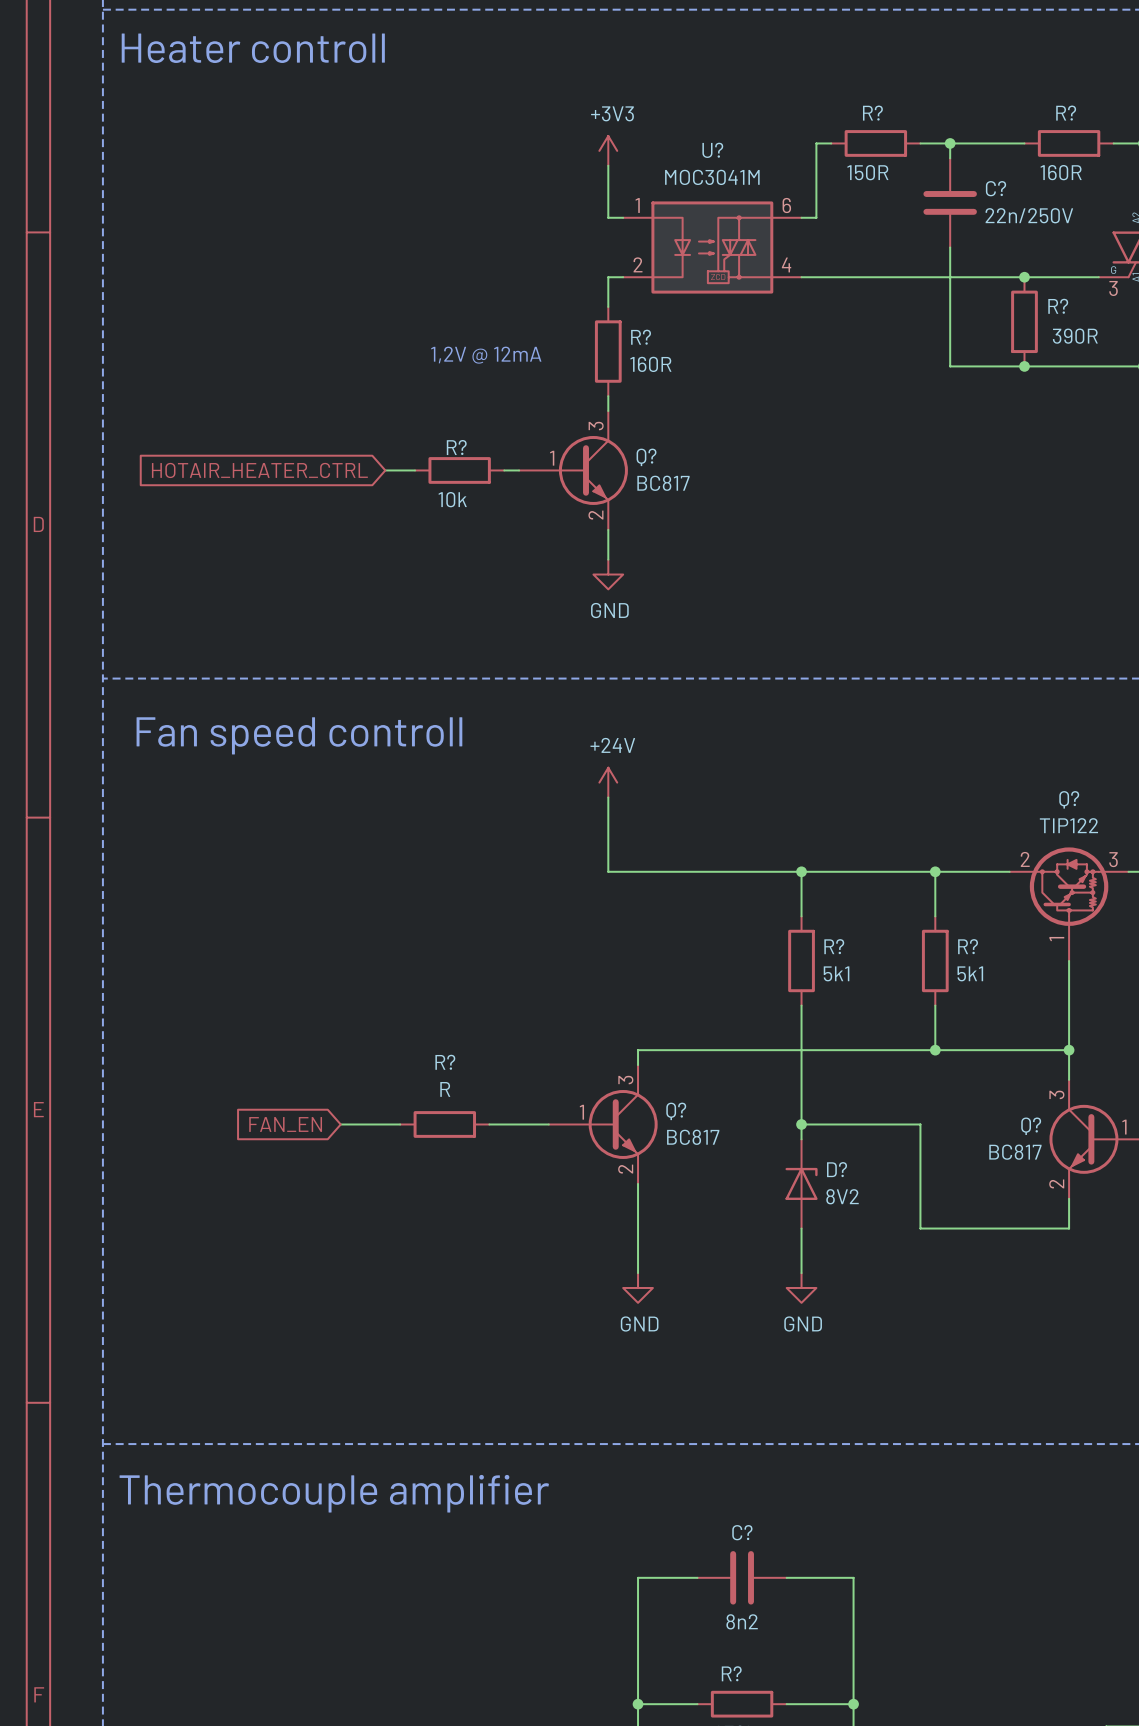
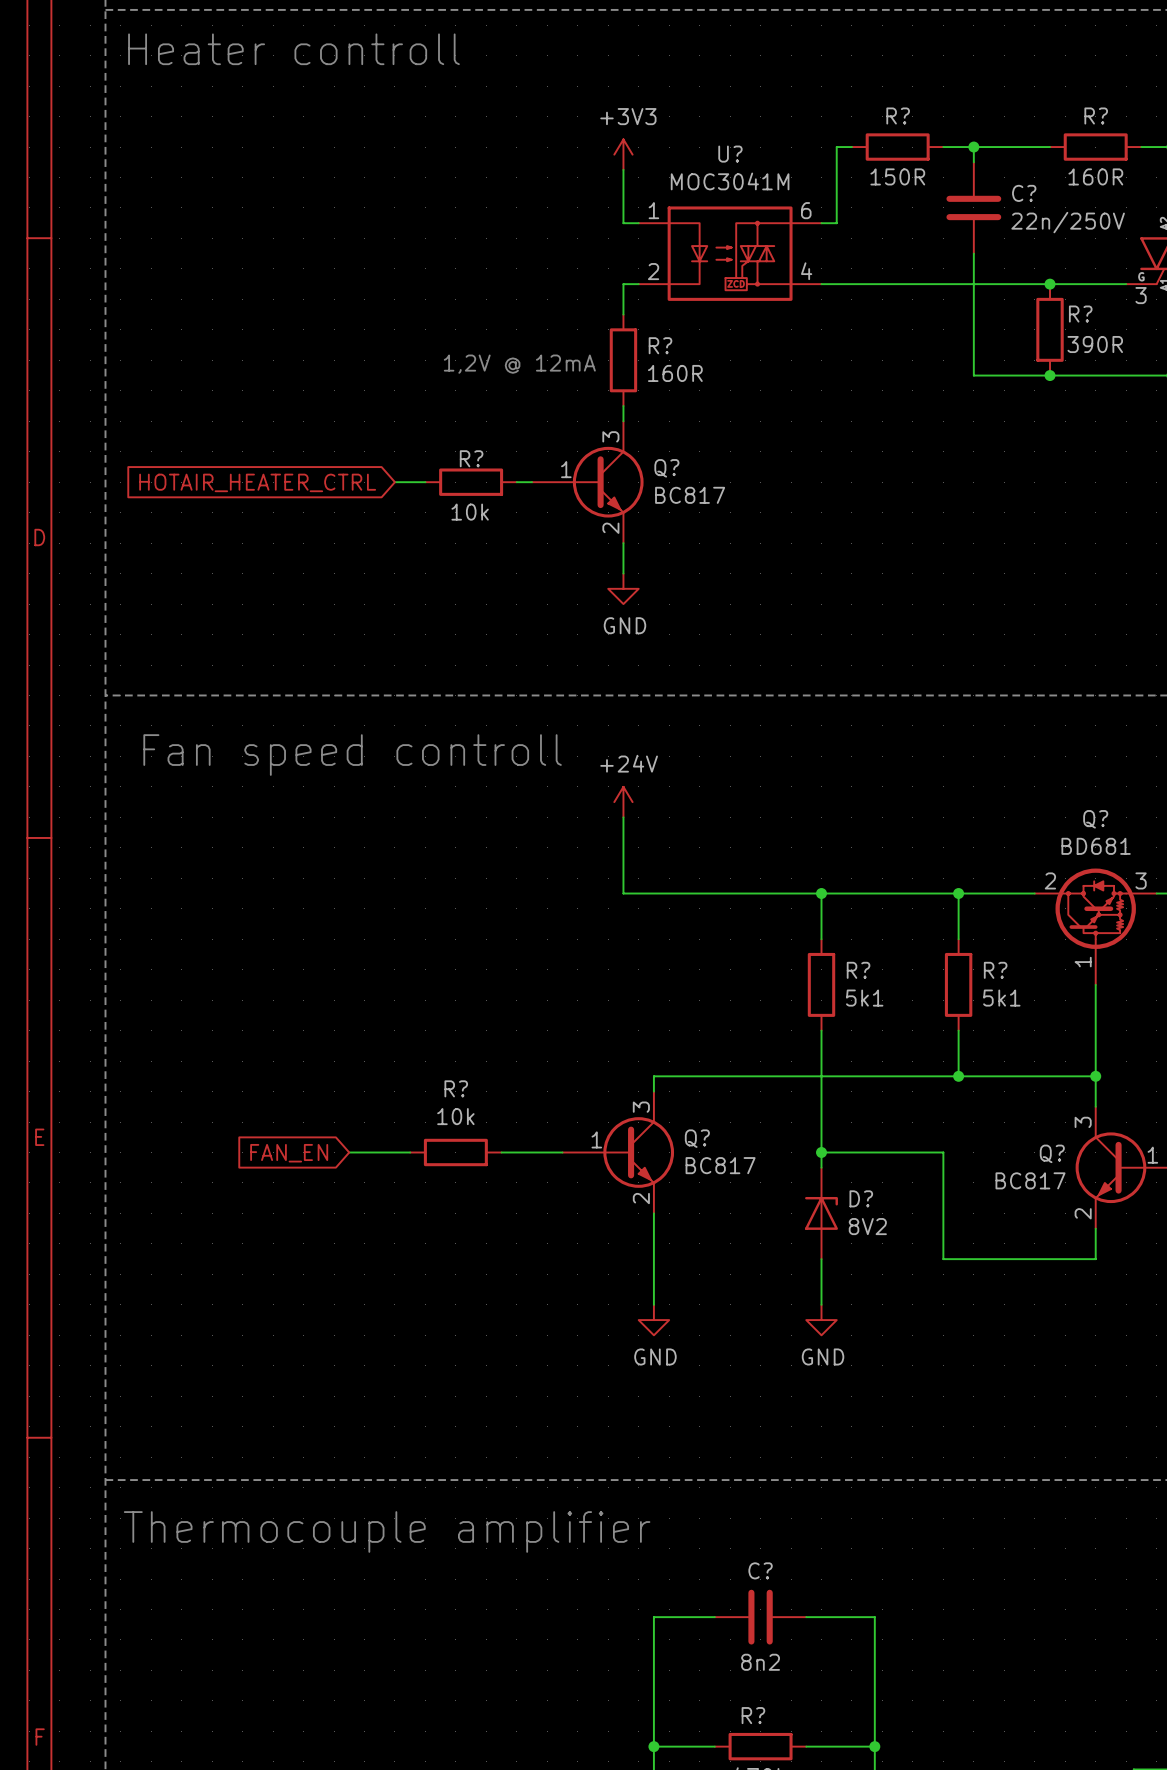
Q? value: TIP122 (1068, 825) -> BD681 (1096, 846)
R? value: R (445, 1089) -> 10k (455, 1116)

